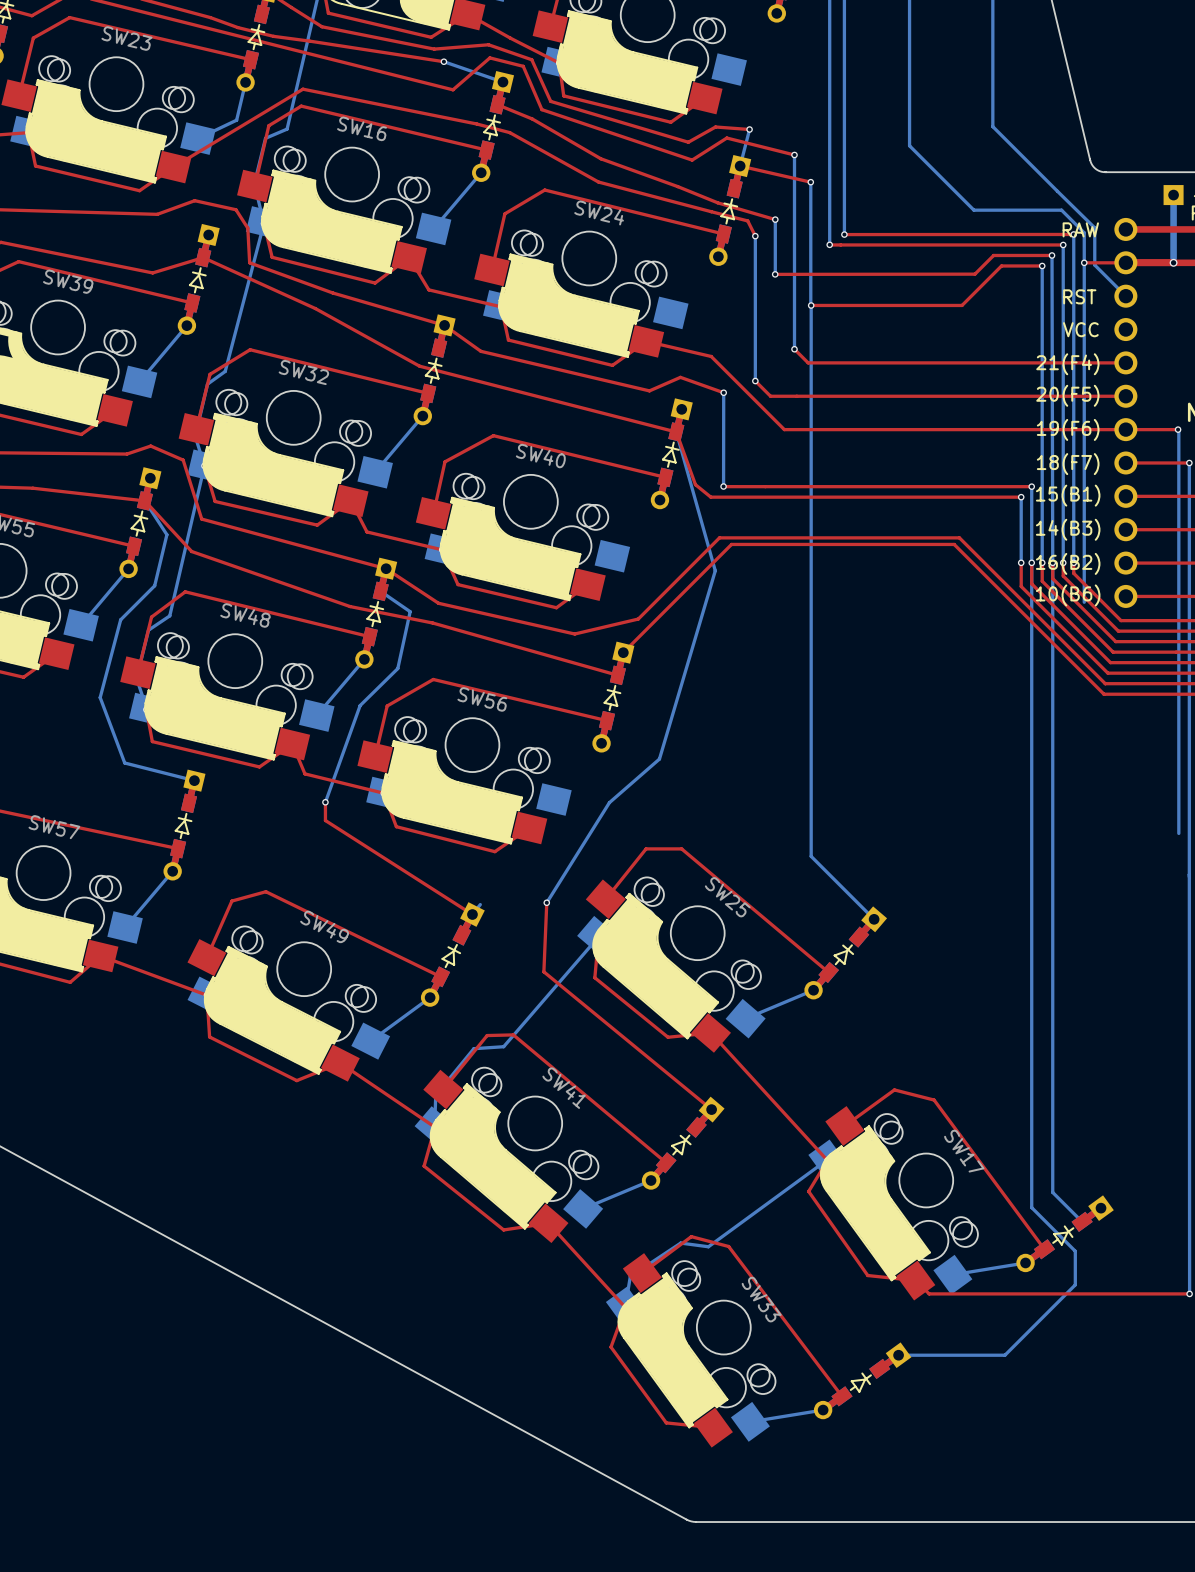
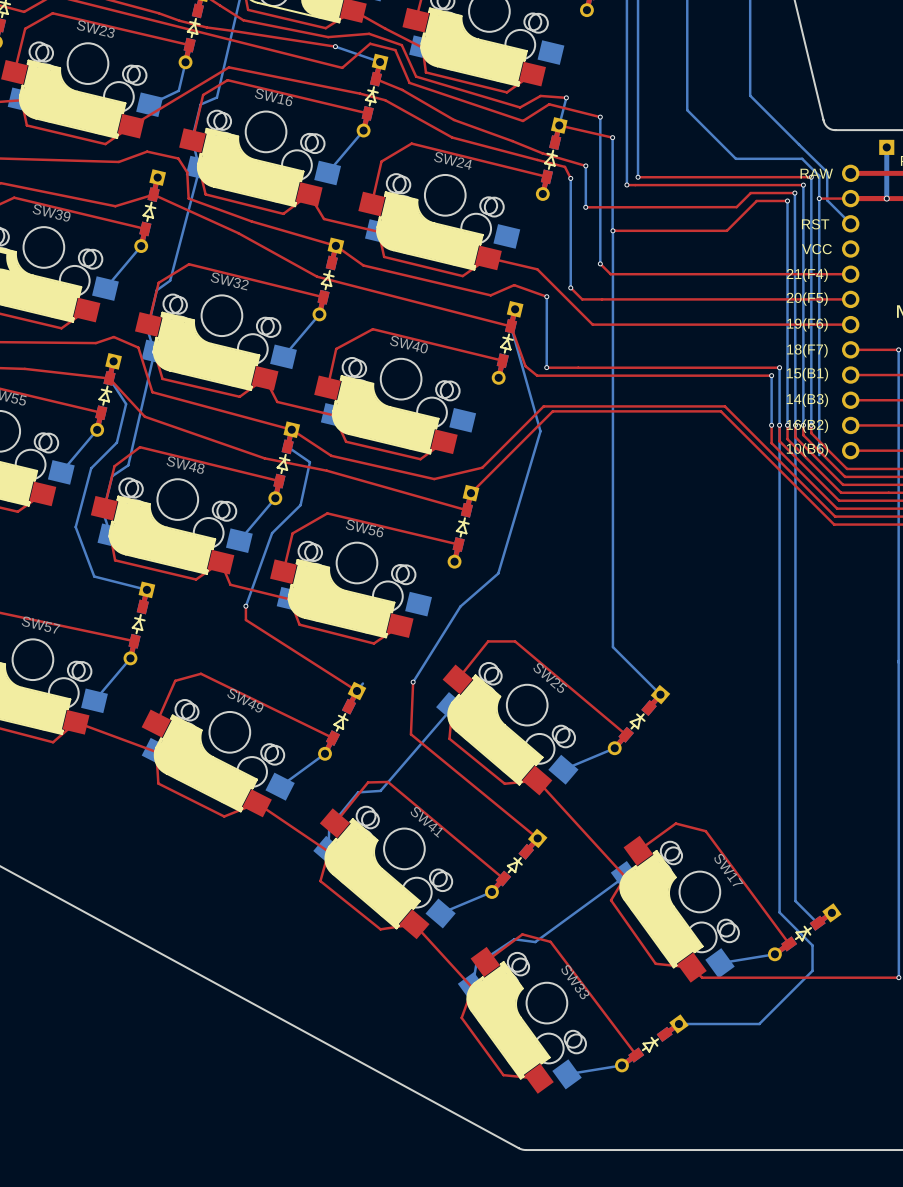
top track: (1125, 429) (1178, 429) -> none
bottom track: (1178, 429) (1178, 833) -> none
via: (1178, 429) -> none

